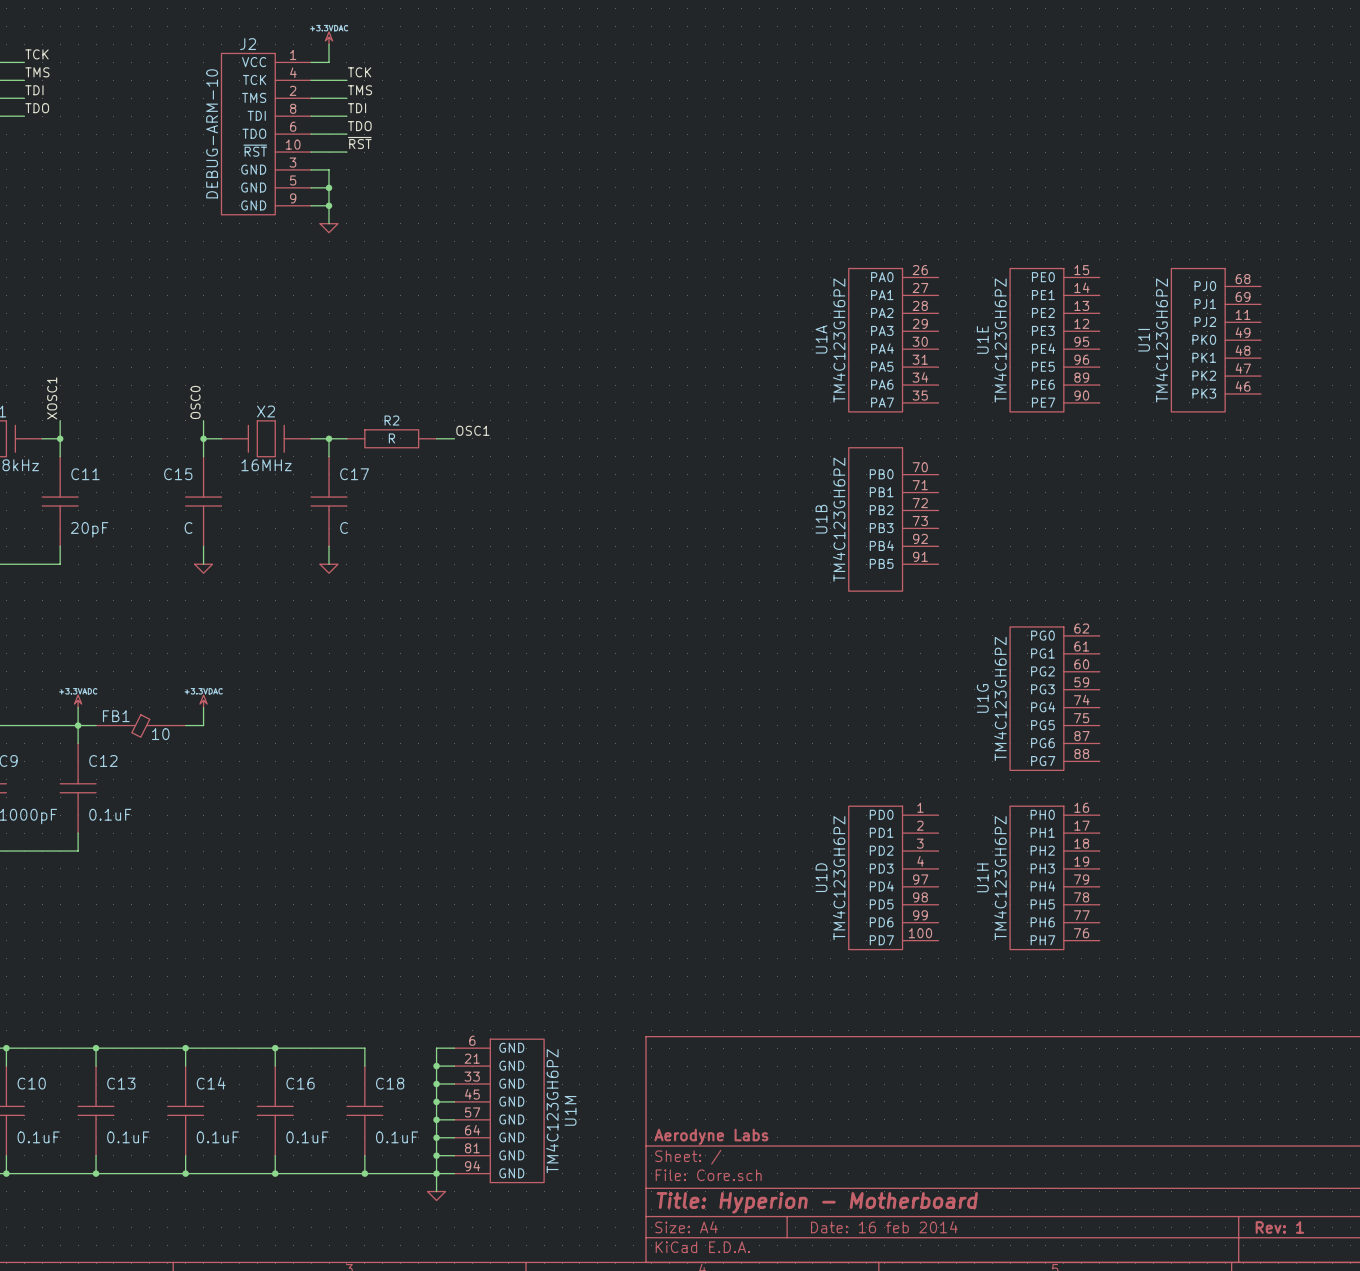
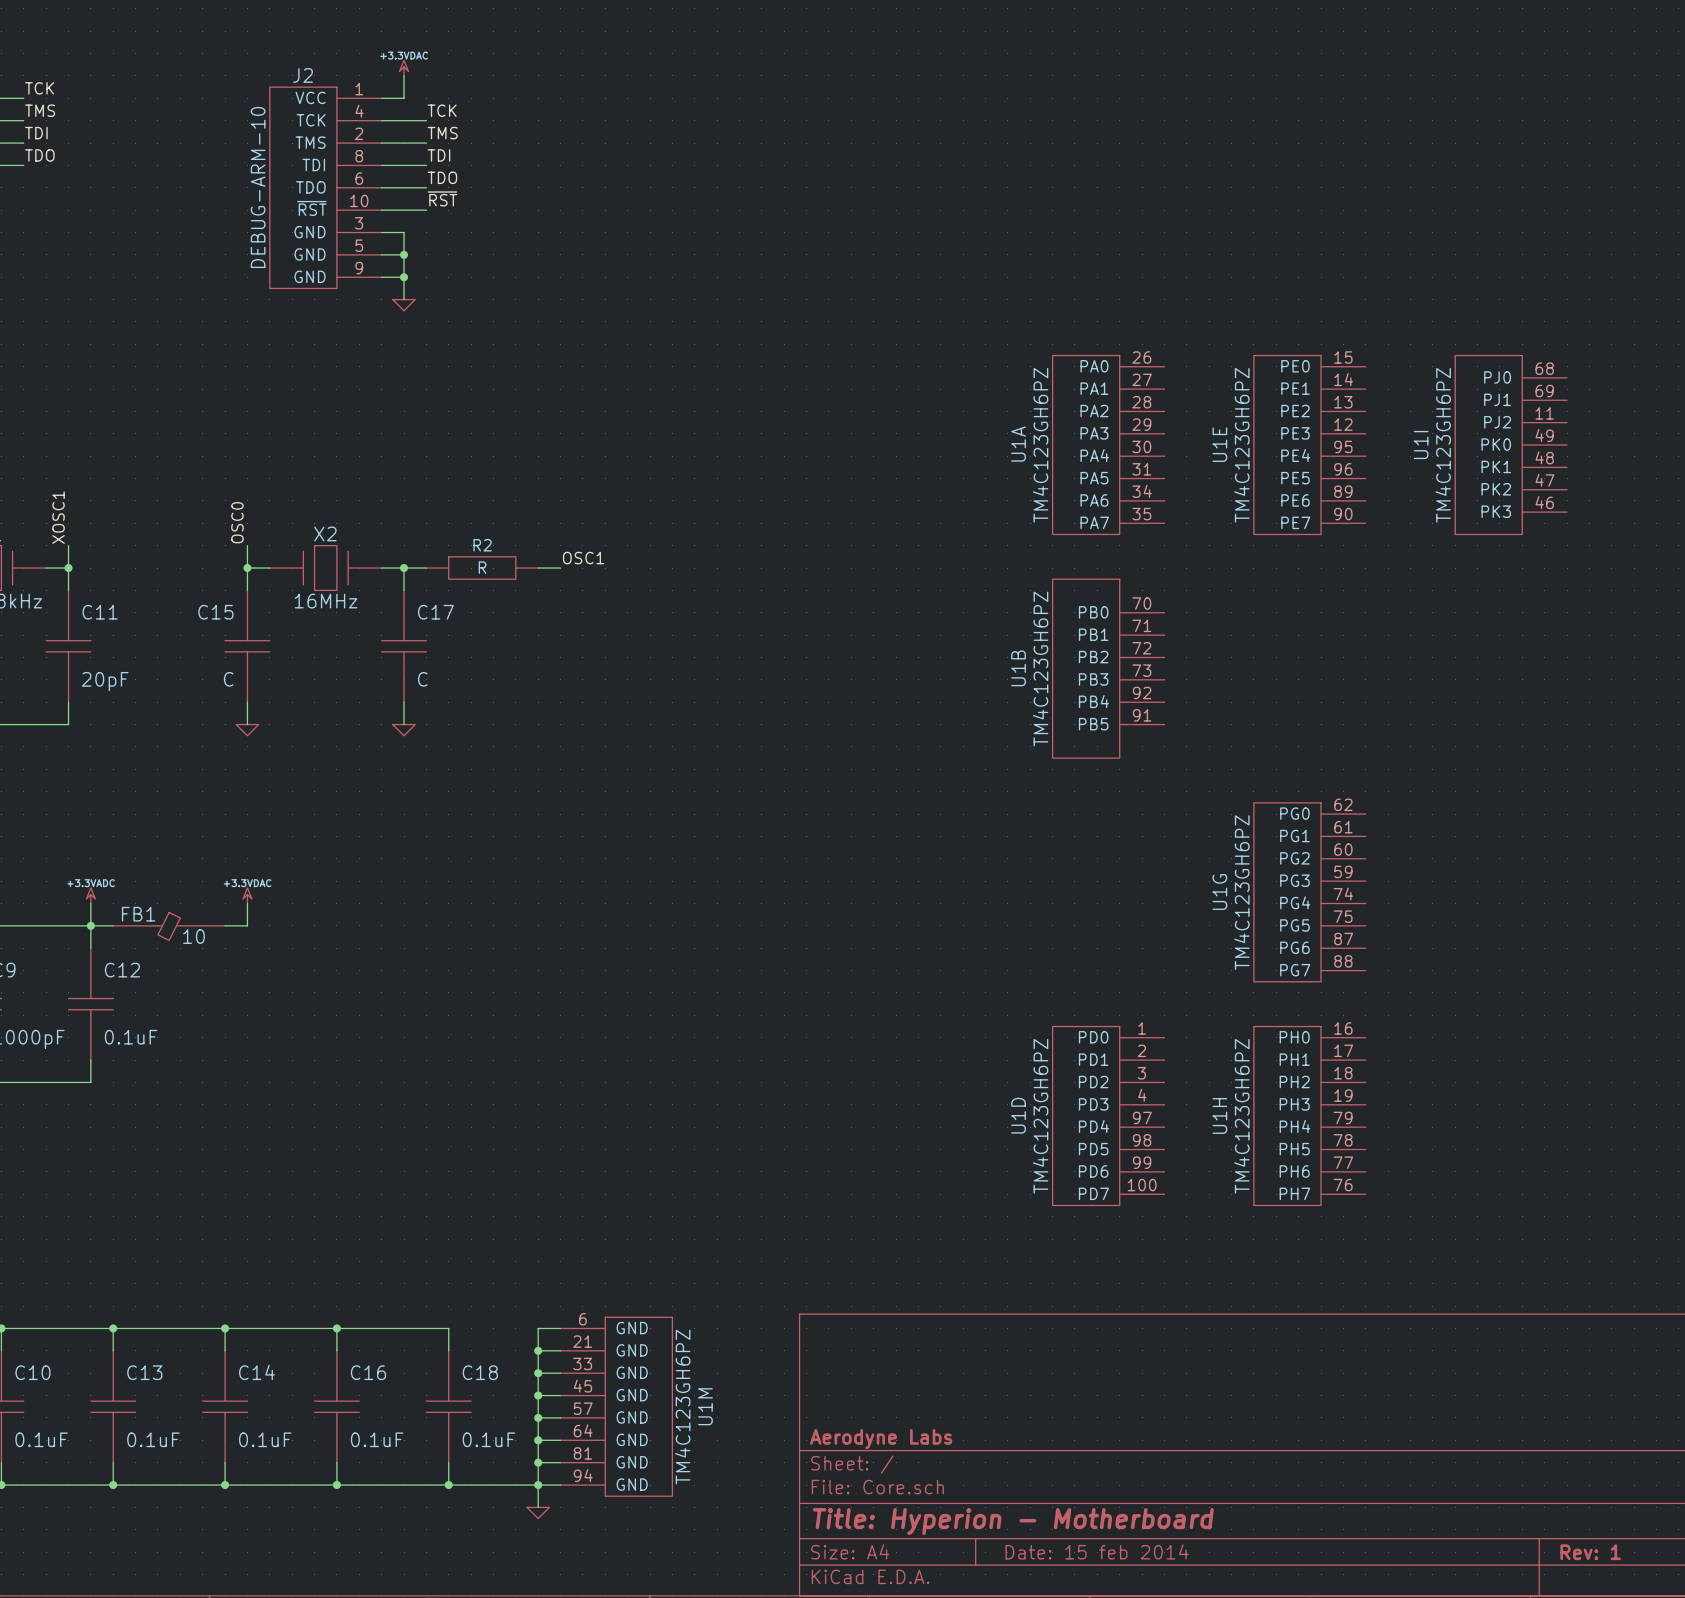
title block: Date: 16 feb 2014 (884, 1227) -> Date: 15 feb 2014 (1097, 1551)

